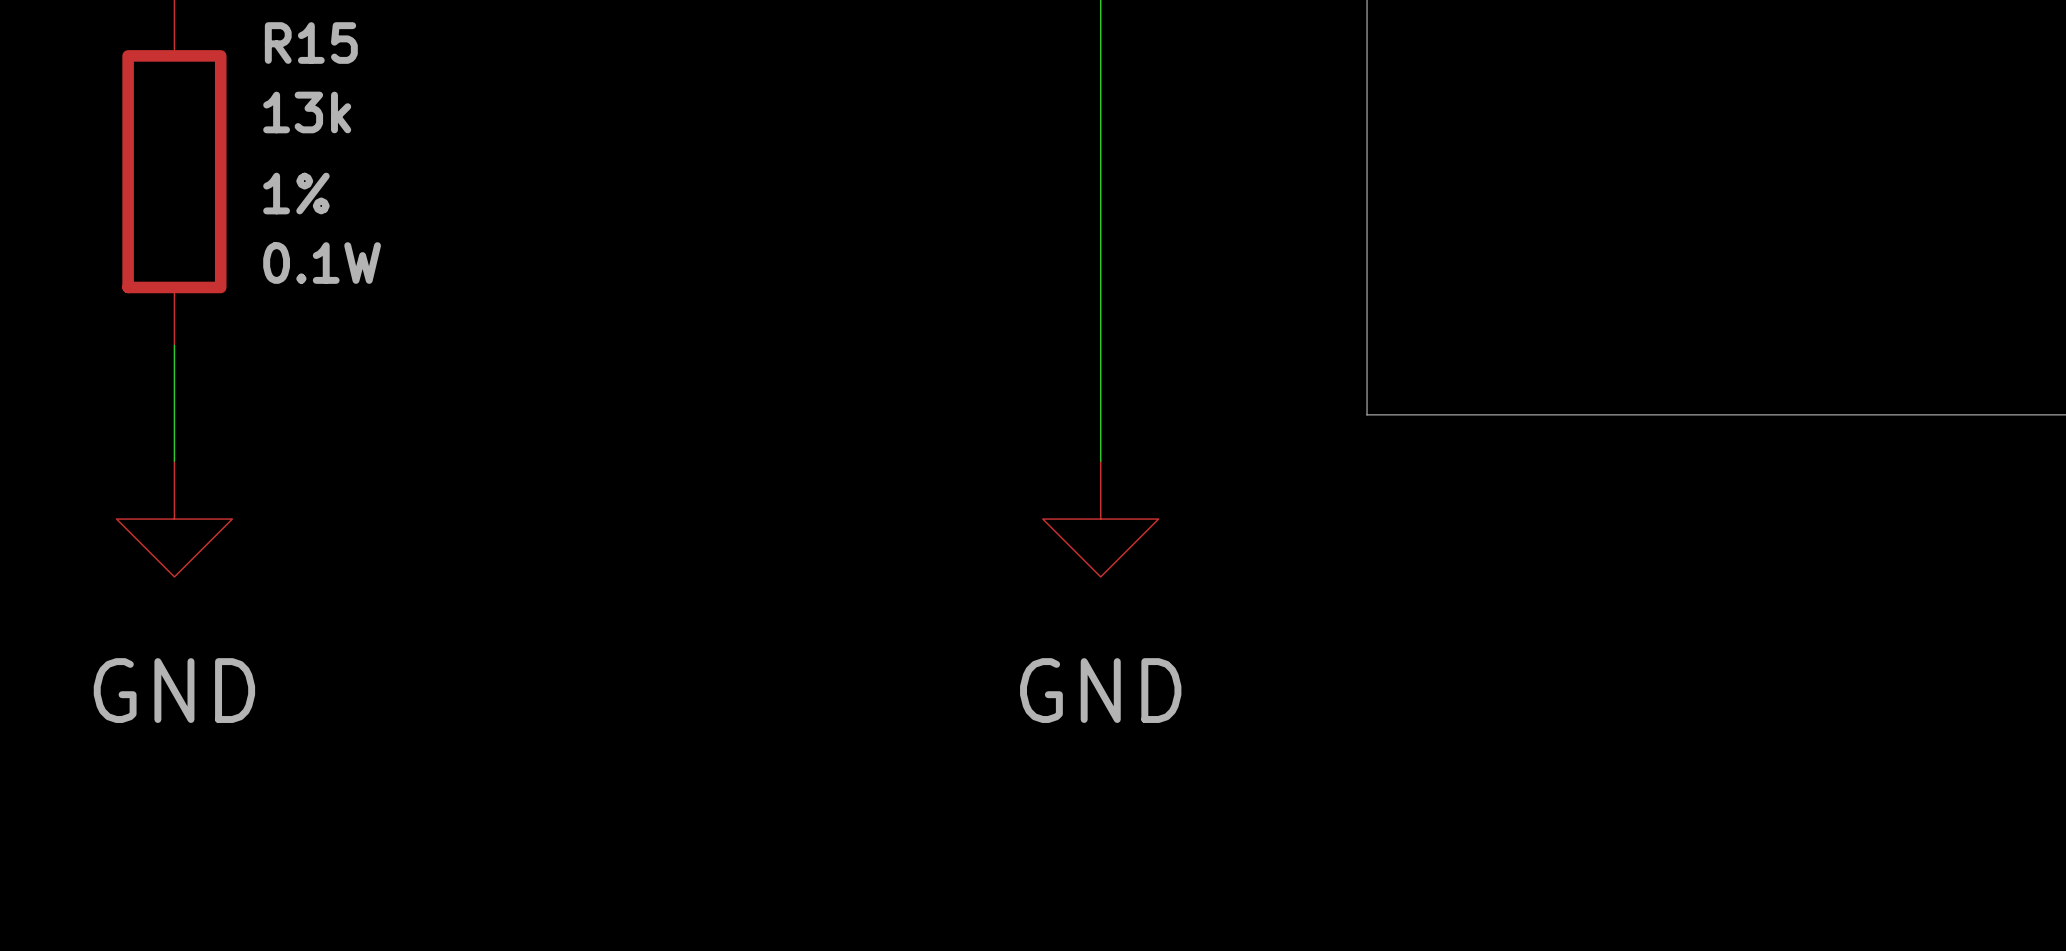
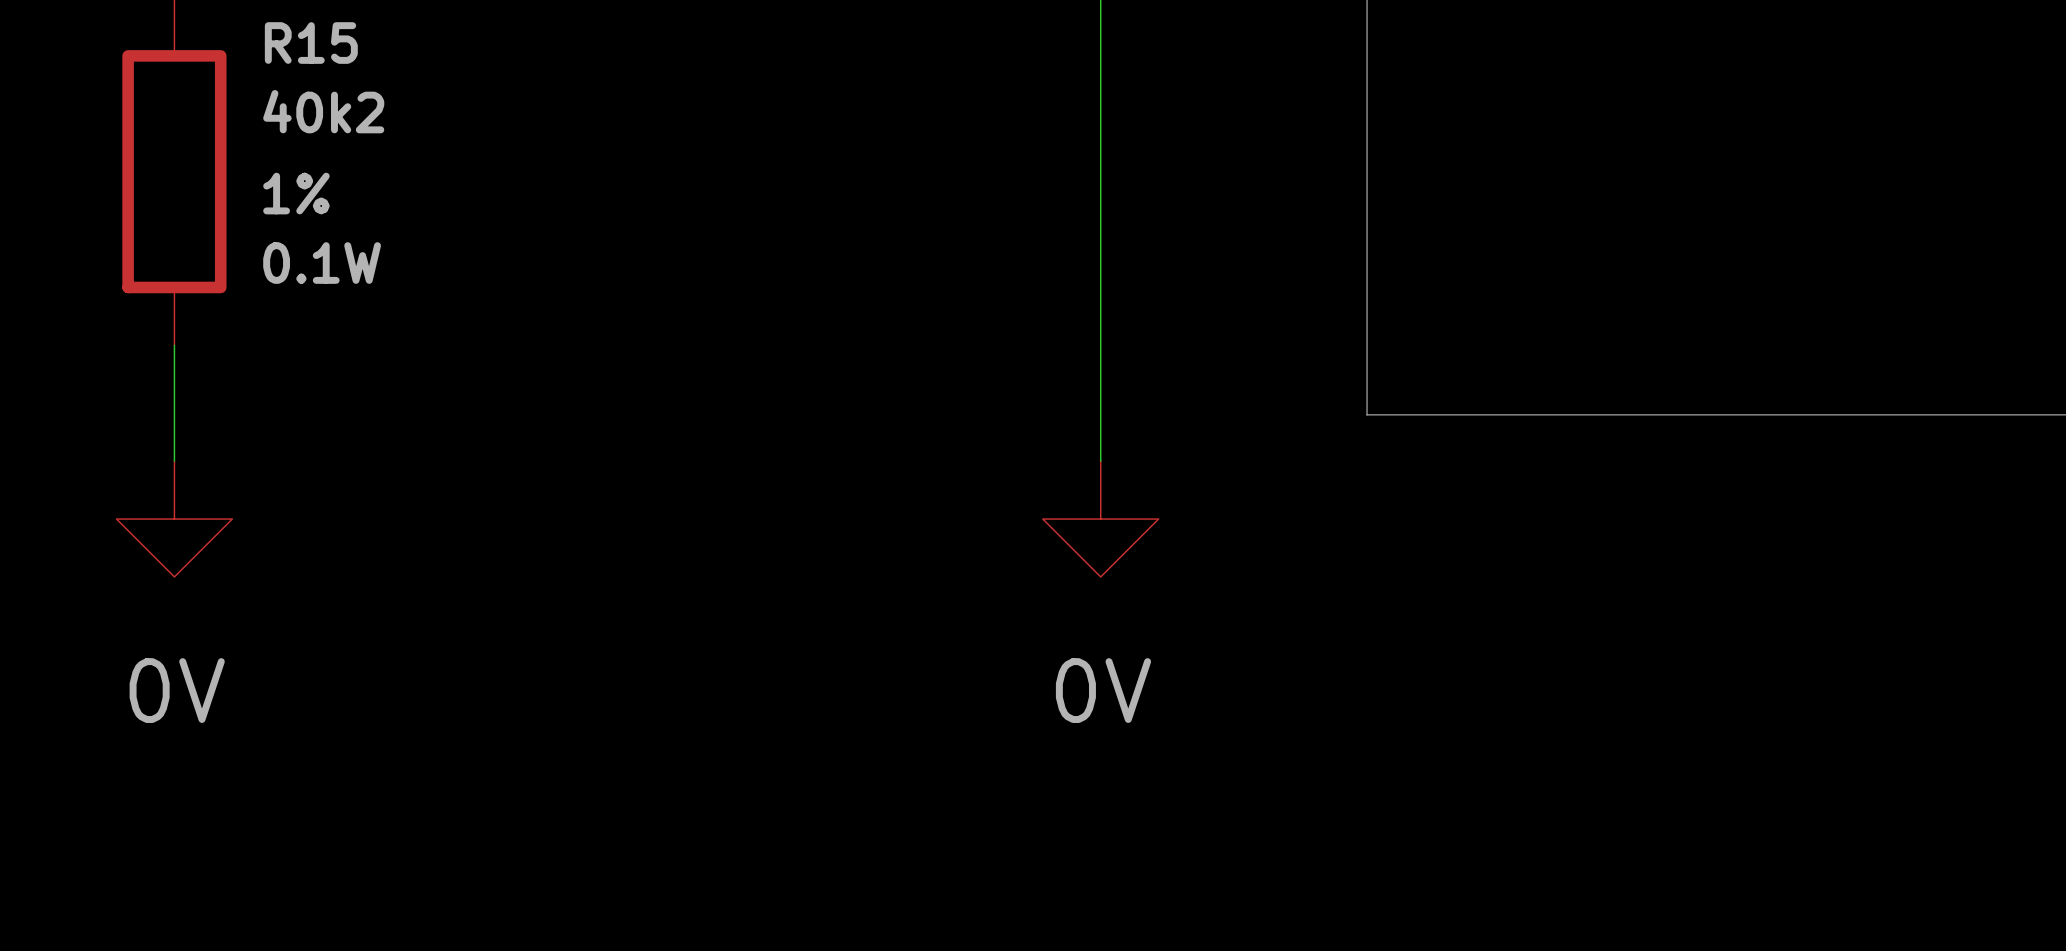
R15 value: 13k (307, 112) -> 40k2 (323, 111)
power symbol: GND (174, 519) -> 0V (174, 519)
power symbol: GND (1100, 519) -> 0V (1100, 519)

